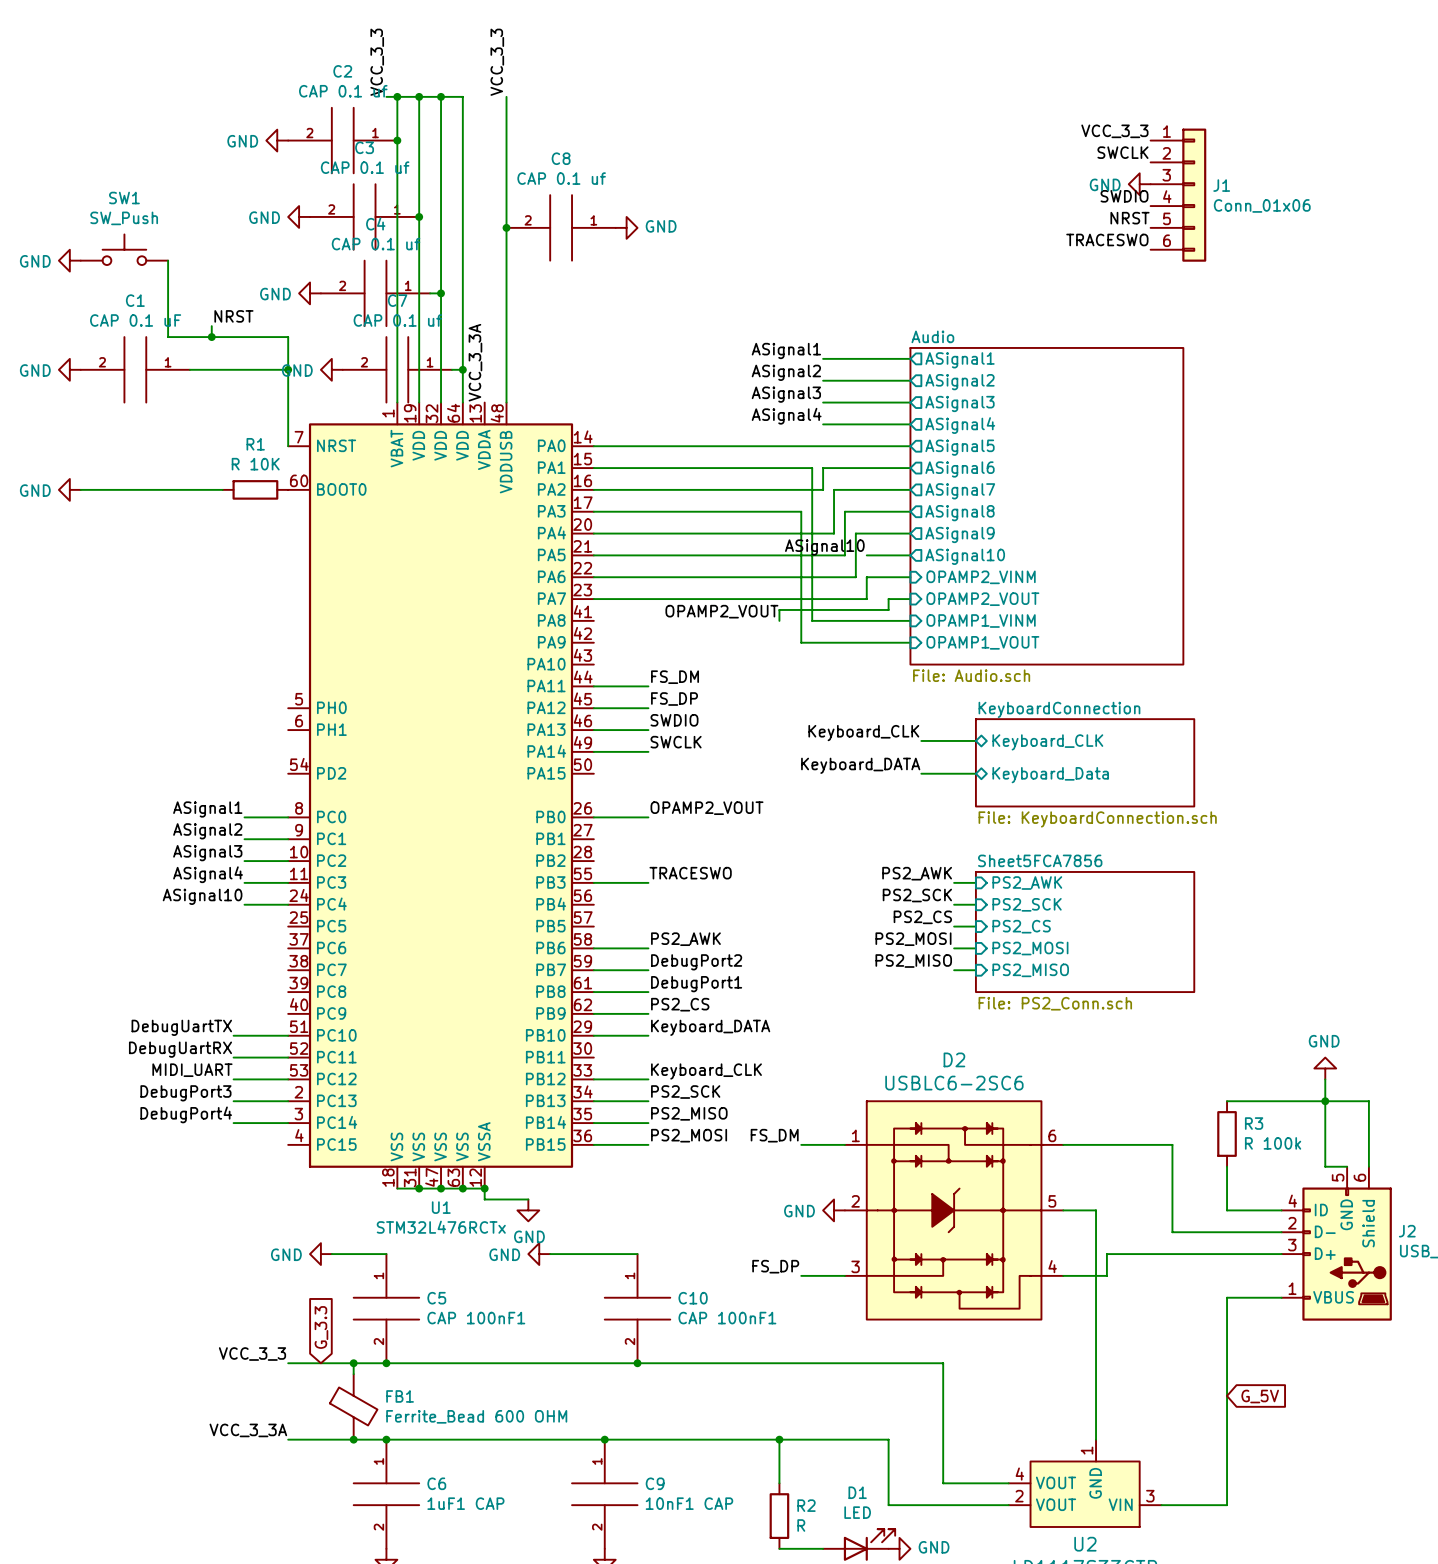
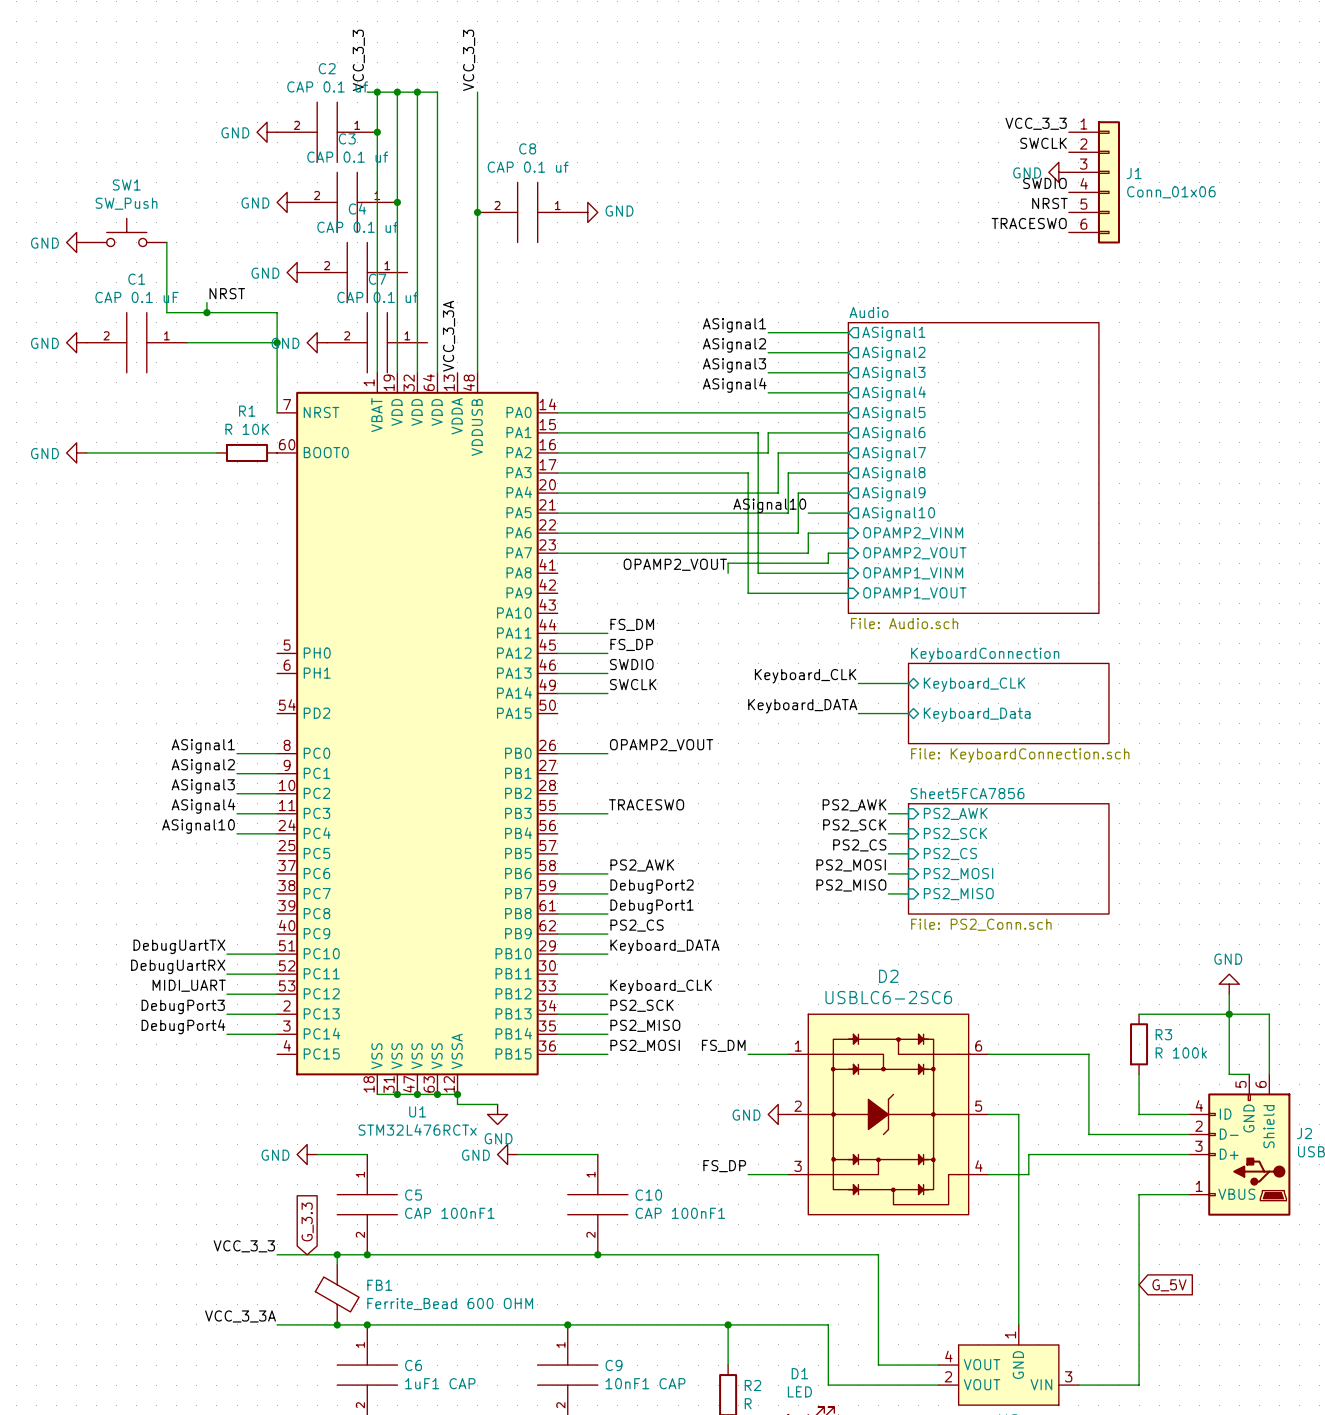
wire: (430, 293) (441, 293) -> none
junction: (441, 293) -> none
wire: (451, 369) (462, 369) -> none
junction: (462, 369) -> none

